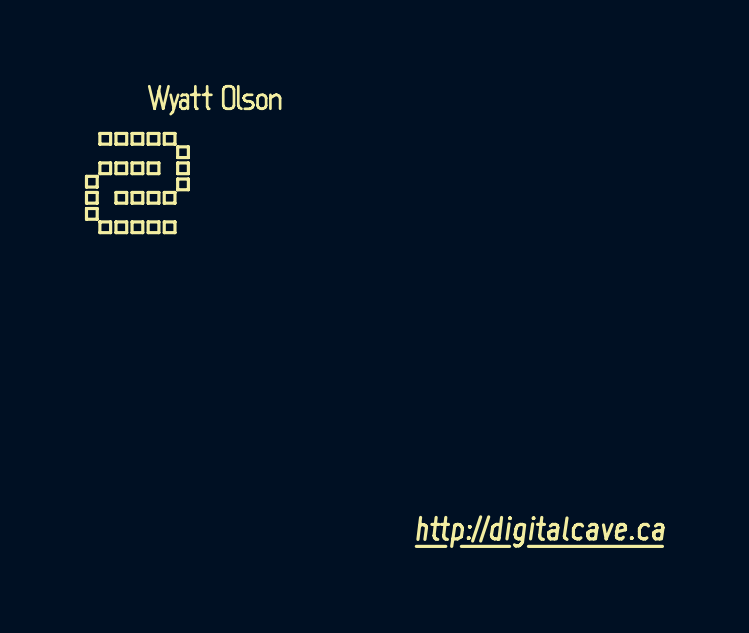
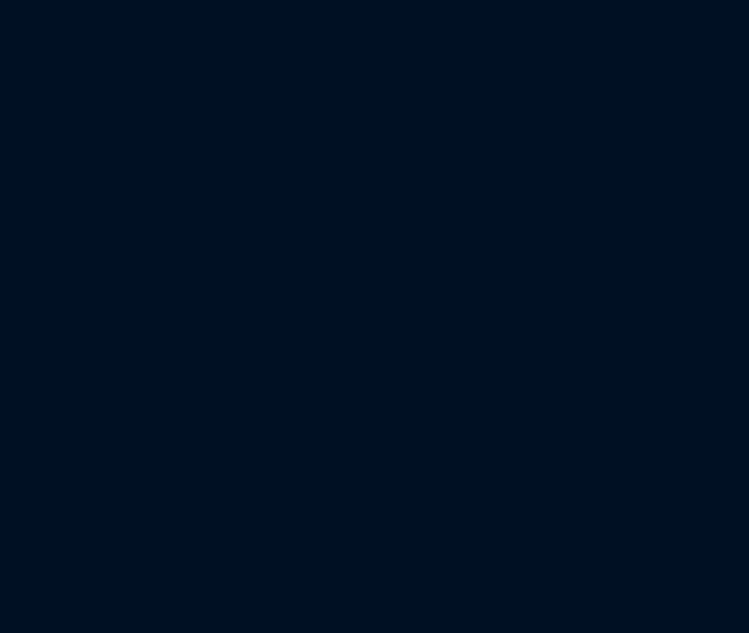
drawing: [84, 84, 282, 235] -> none
drawing: [414, 515, 665, 548] -> none

